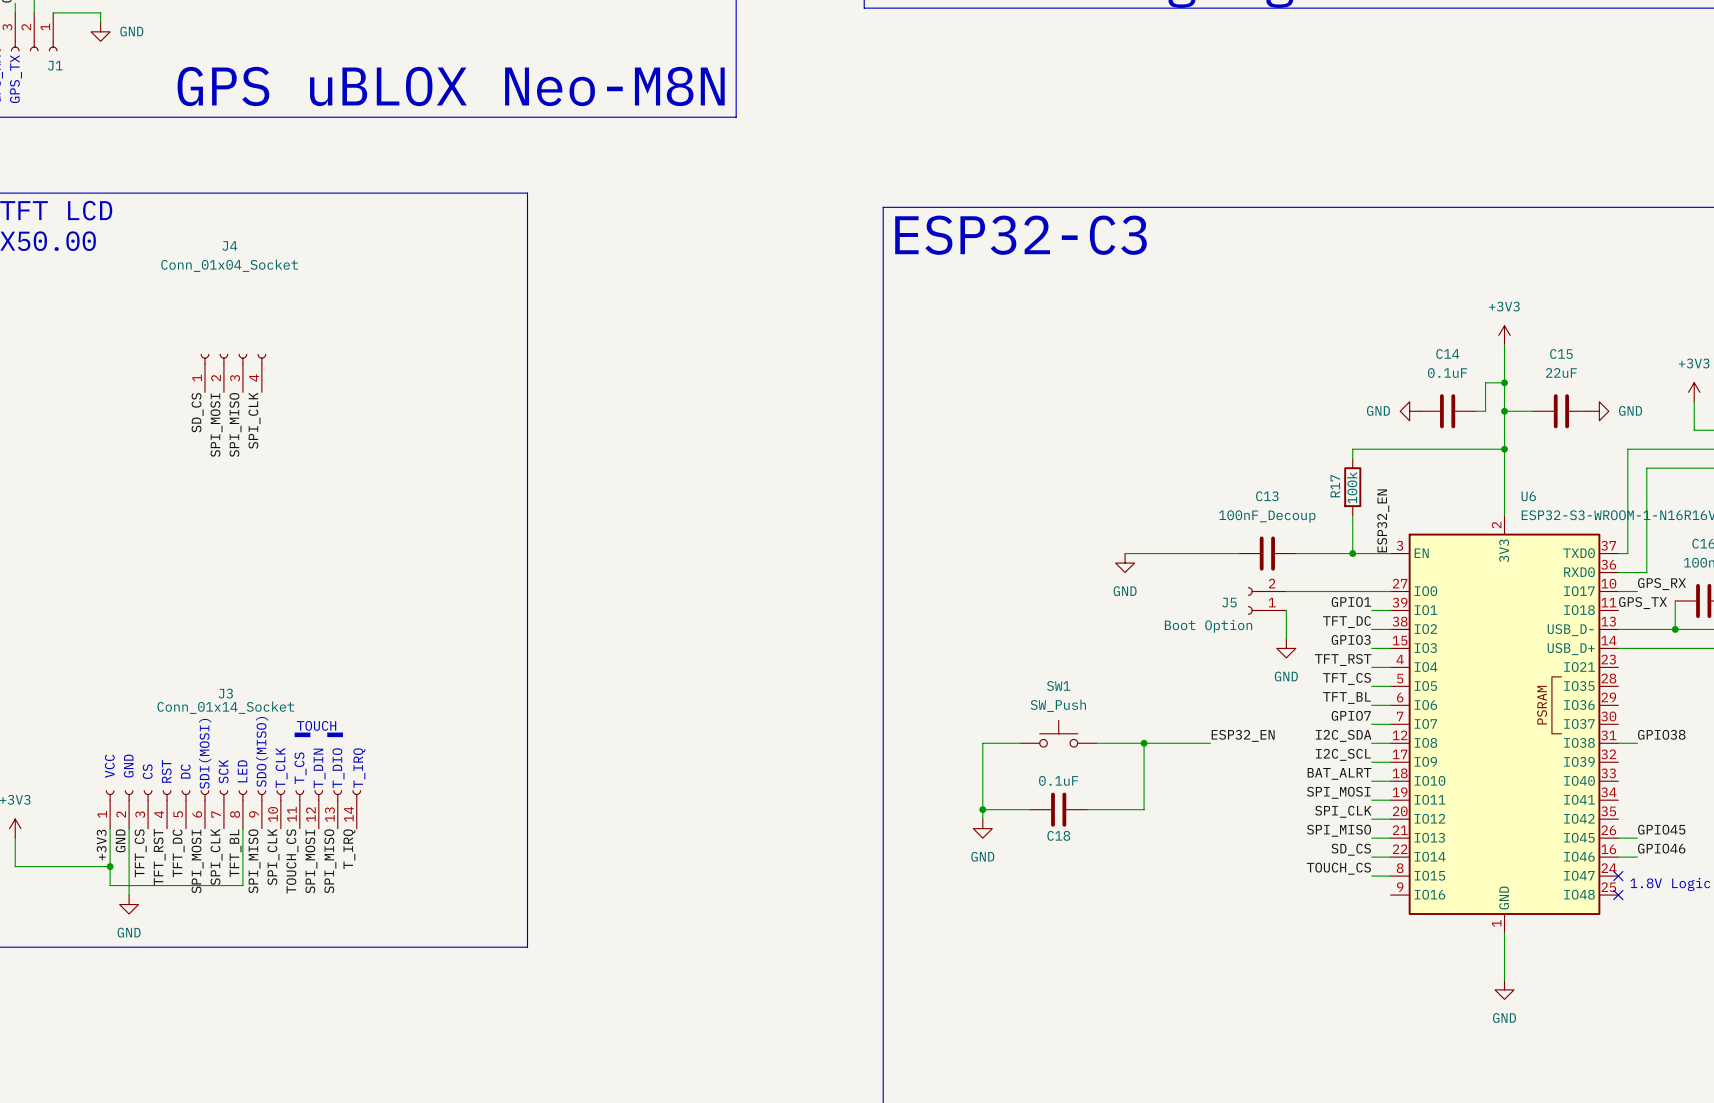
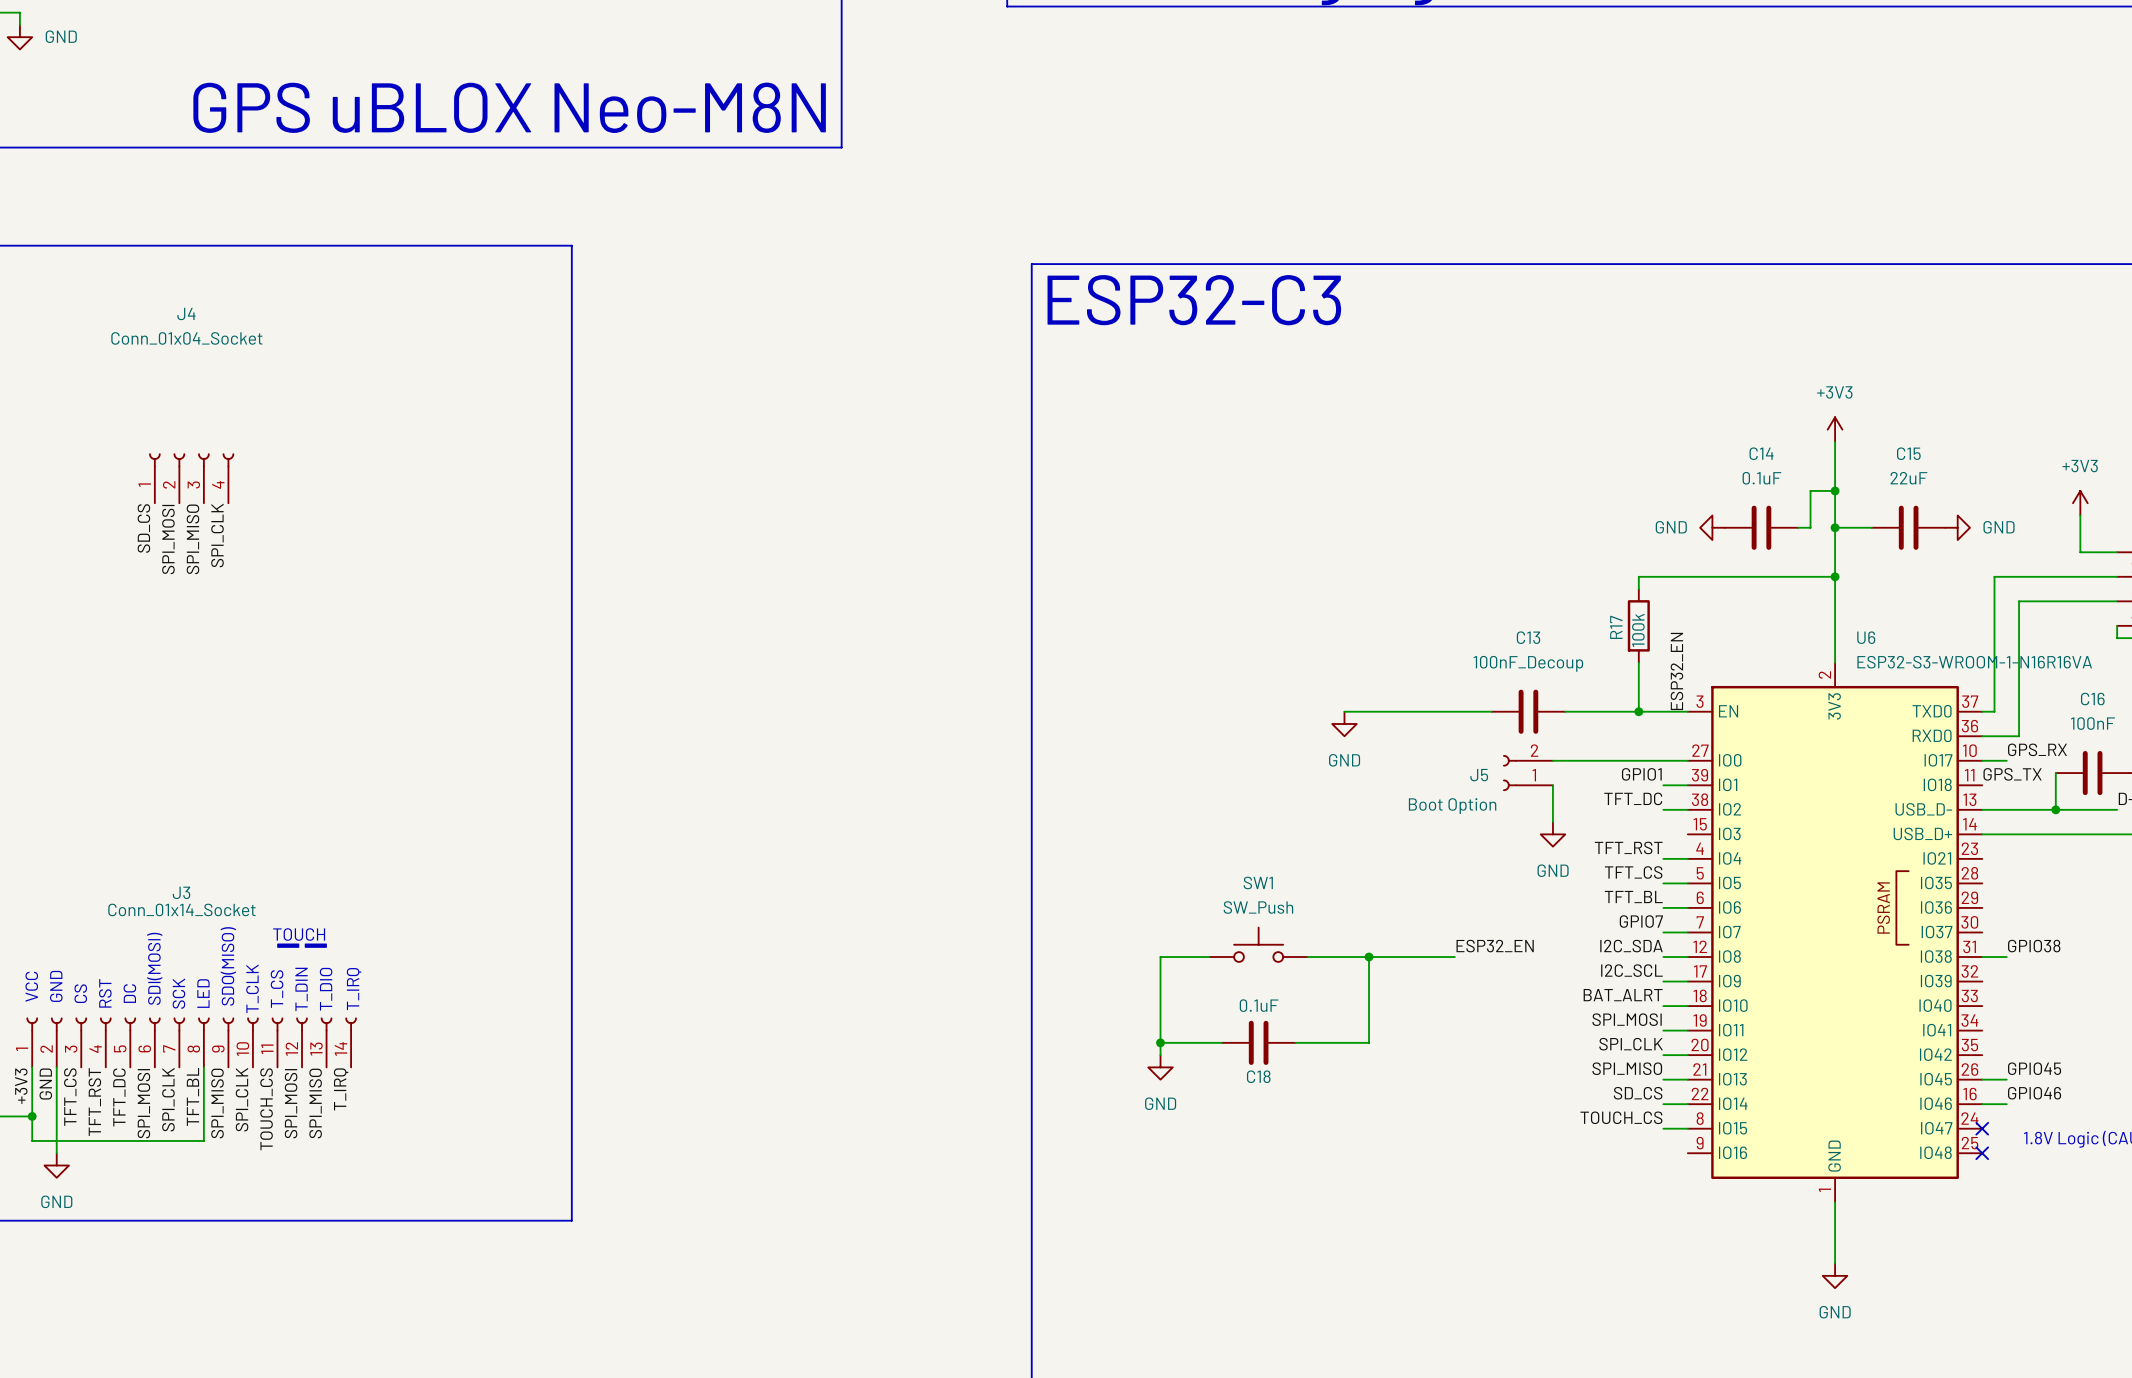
label: GPIO3 (1351, 639) -> none
wire: (1371, 648) (1390, 648) -> none

